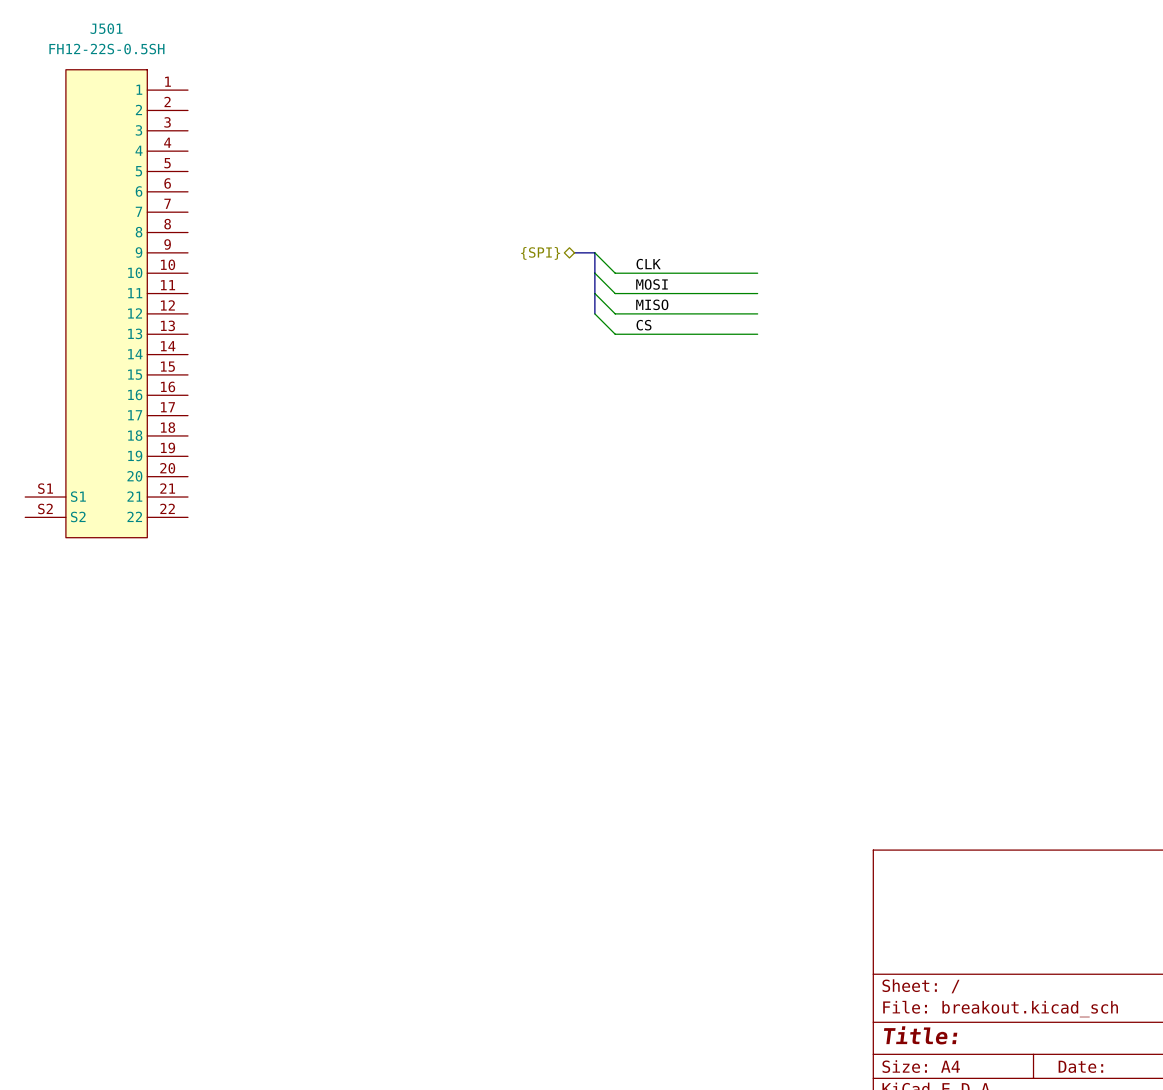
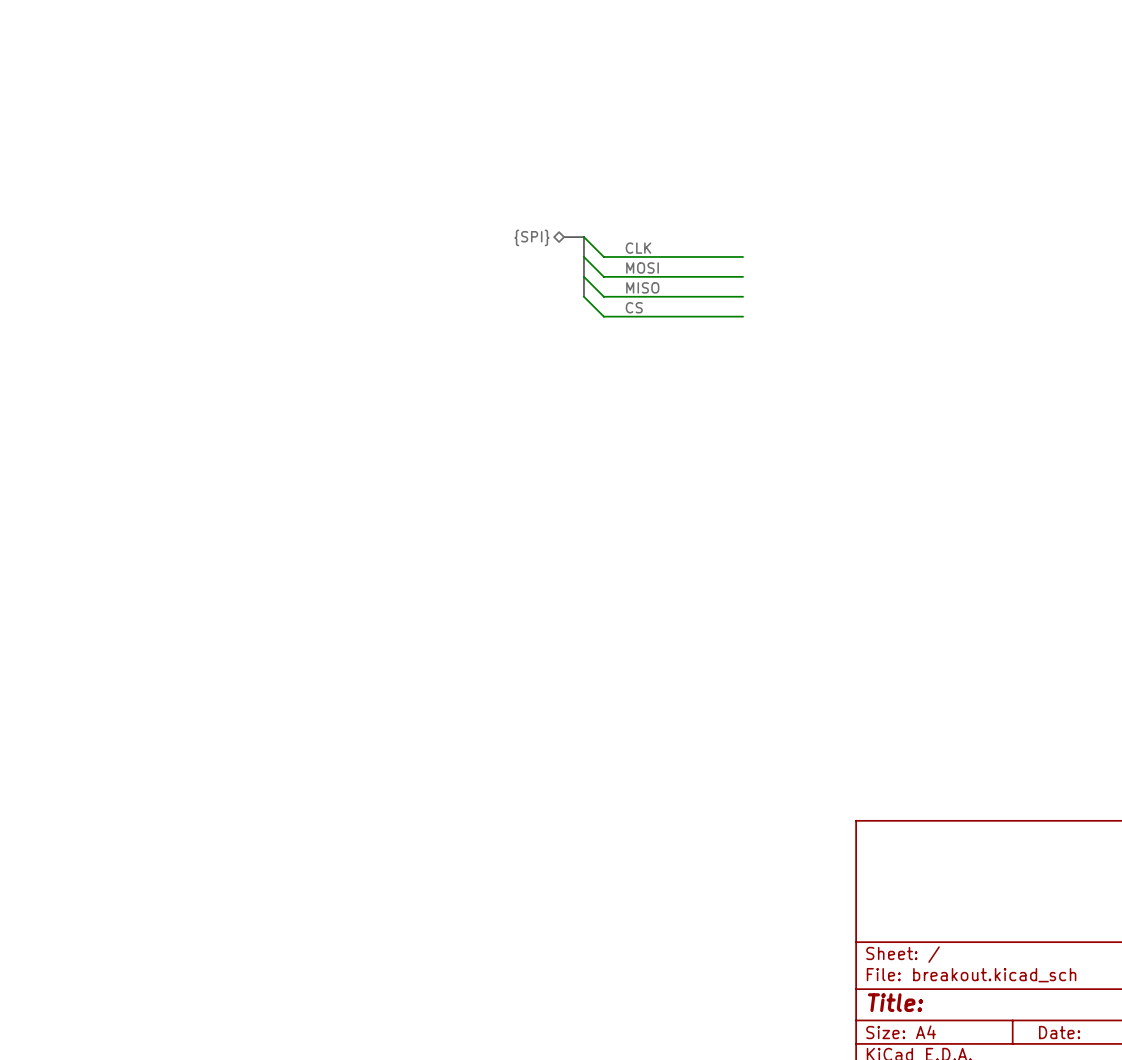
J501: FH12-22S-0.5SH (106, 303) -> none

